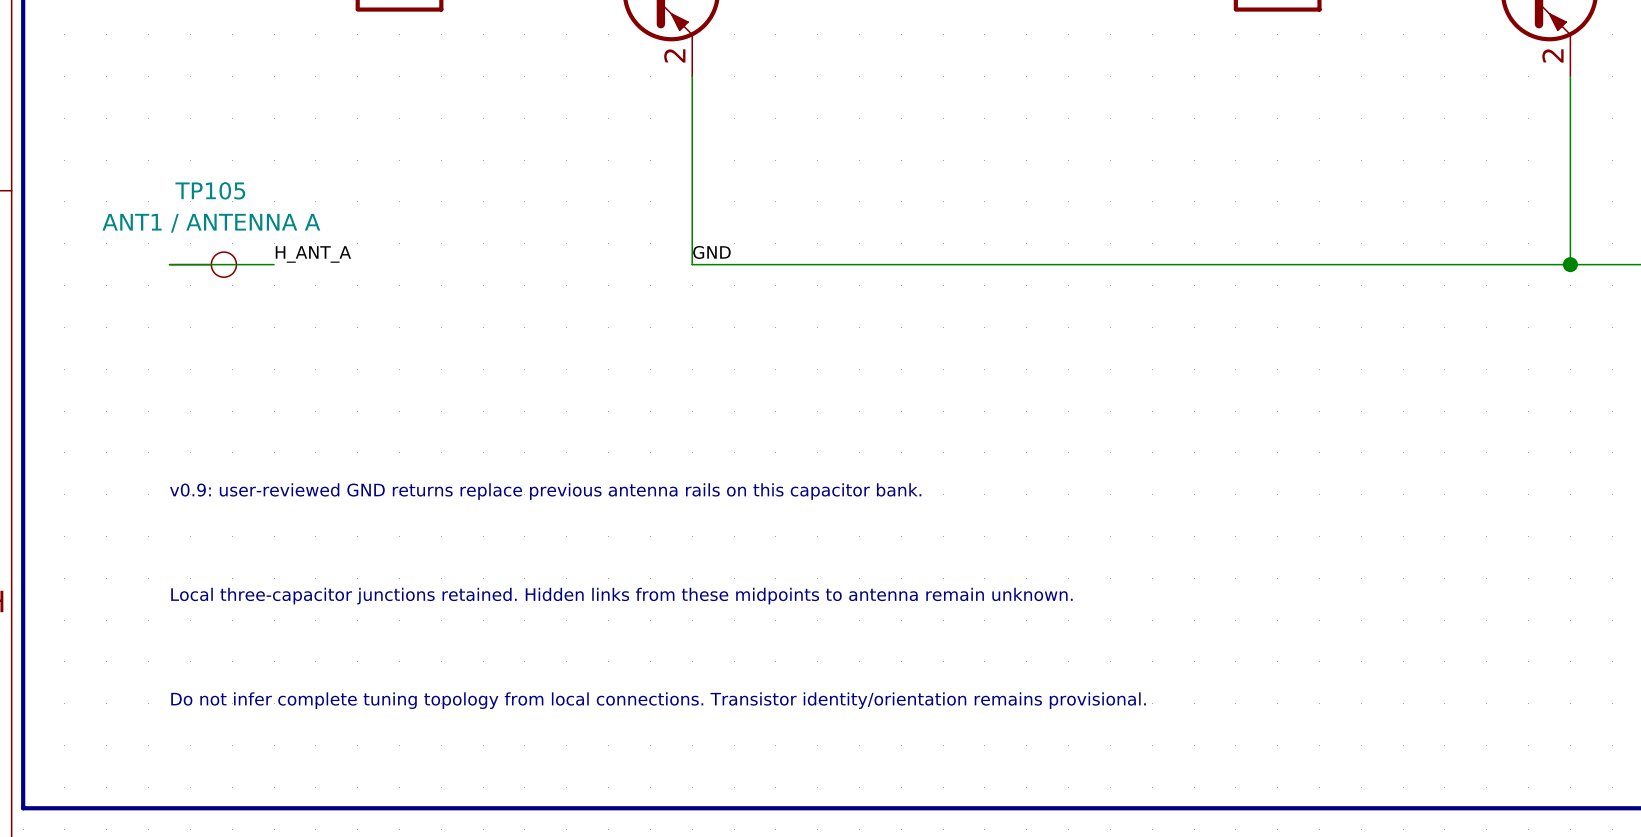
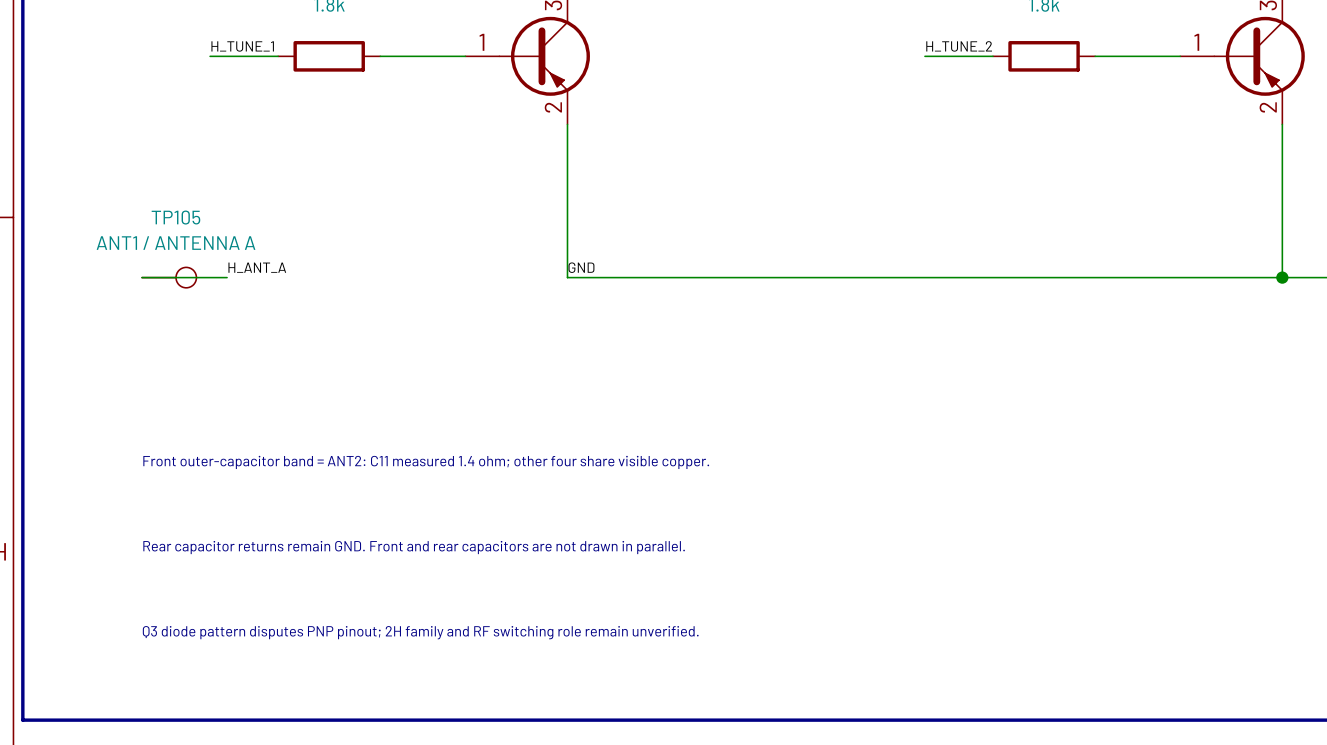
text: v0.9: user-reviewed GND returns replace previous antenna rails on this capacitor bank. (545, 491) -> Front outer-capacitor band = ANT2: C11 measured 1.4 ohm; other four share visible copper. (426, 462)
text: Local three-capacitor junctions retained. Hidden links from these midpoints to antenna remain unknown. (621, 596) -> Rear capacitor returns remain GND. Front and rear capacitors are not drawn in parallel. (414, 547)
text: Do not infer complete tuning topology from local connections. Transistor identity/orientation remains provisional. (658, 700) -> Q3 diode pattern disputes PNP pinout; 2H family and RF switching role remain unverified. (420, 632)

